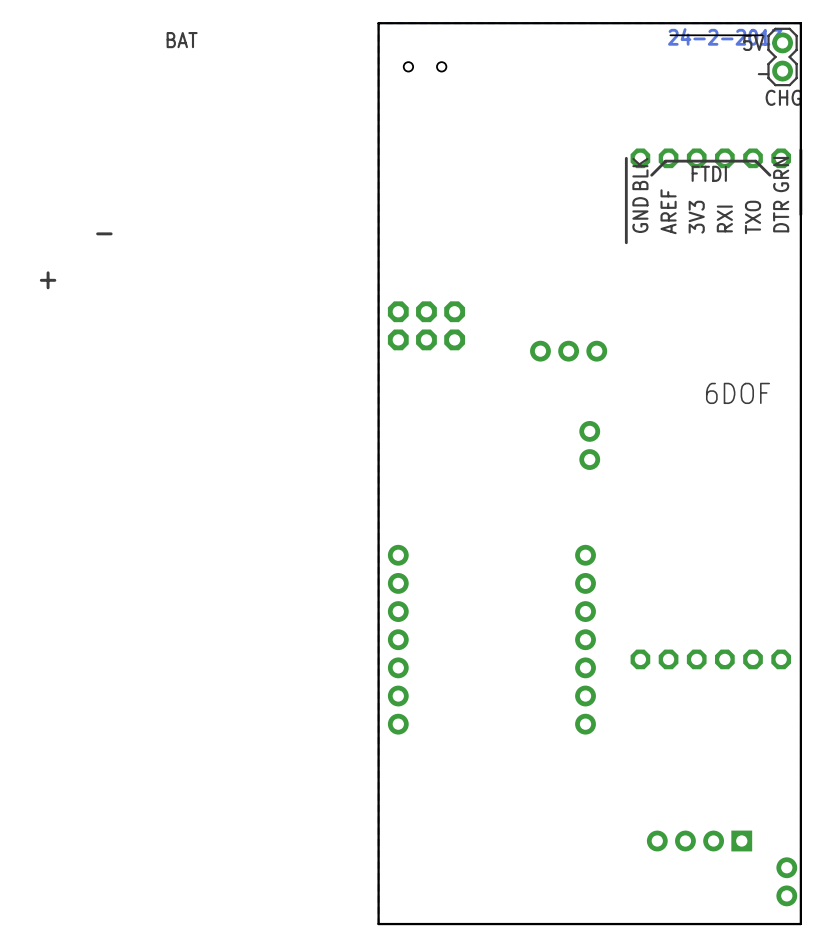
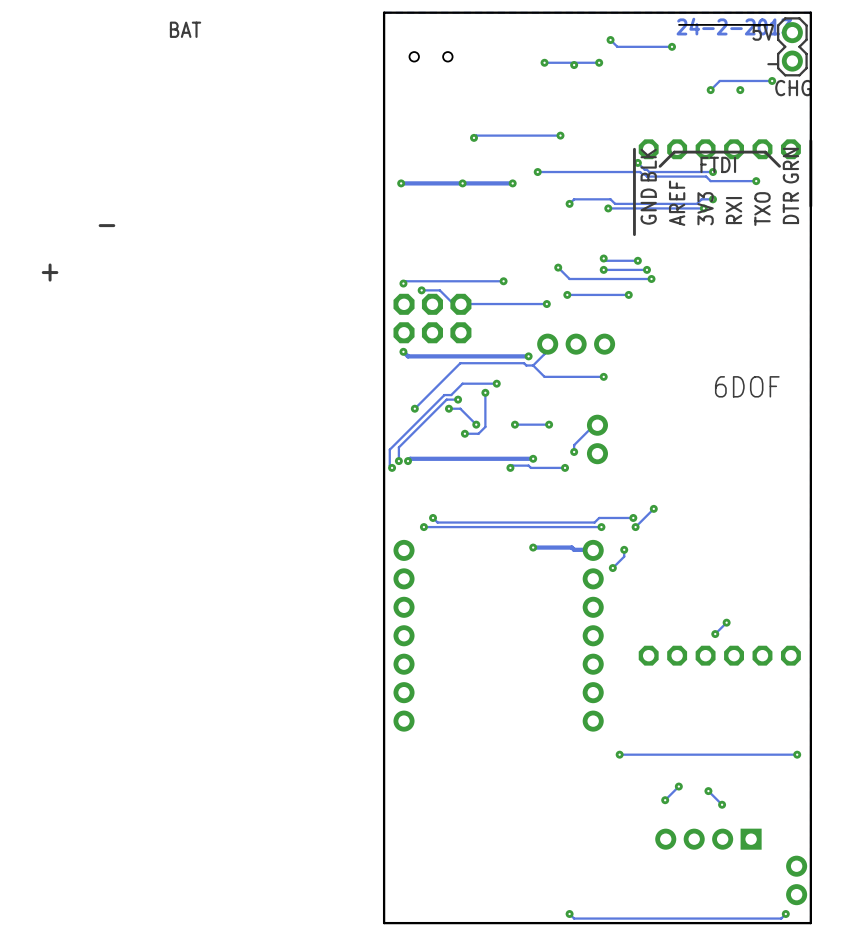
track: none -> (610, 40) (617, 46) (672, 46)
via: none -> (610, 40)
via: none -> (672, 46)
via: none -> (544, 62)
track: none -> (599, 62) (544, 62)
via: none -> (599, 62)
via: none -> (574, 65)
track: none -> (772, 80) (719, 80) (710, 90)
via: none -> (772, 80)
via: none -> (710, 90)
via: none -> (740, 90)
track: none -> (560, 135) (476, 135) (474, 137)
via: none -> (560, 135)
via: none -> (474, 137)
track: none -> (637, 162) (649, 172) (712, 172)
via: none -> (637, 162)
track: none -> (537, 172) (640, 172) (646, 176) (706, 176) (710, 181) (756, 181)
via: none -> (537, 172)
via: none -> (712, 172)
via: none -> (756, 181)
via: none -> (401, 183)
via: none -> (462, 183)
track: none -> (512, 183) (401, 183)
via: none -> (512, 183)
track: none -> (712, 199) (701, 199) (697, 203) (615, 203) (610, 199) (574, 199) (569, 203)
via: none -> (712, 199)
via: none -> (569, 203)
via: none -> (608, 208)
track: none -> (703, 208) (608, 208)
via: none -> (703, 208)
track: none -> (603, 258) (606, 260) (637, 260)
via: none -> (603, 258)
via: none -> (637, 260)
track: none -> (558, 267) (569, 278) (651, 278)
via: none -> (558, 267)
via: none -> (603, 269)
track: none -> (646, 269) (603, 269)
via: none -> (646, 269)
via: none -> (651, 278)
track: none -> (503, 281) (405, 281) (403, 283)
via: none -> (503, 281)
via: none -> (403, 283)
track: none -> (421, 290) (439, 290) (453, 304) (546, 304)
via: none -> (421, 290)
via: none -> (567, 294)
track: none -> (628, 294) (567, 294)
via: none -> (628, 294)
via: none -> (546, 304)
track: none -> (547, 344) (544, 345) (544, 354) (533, 365)
track: none -> (403, 351) (407, 356) (528, 356)
via: none -> (403, 351)
via: none -> (528, 356)
track: none -> (533, 365) (526, 365) (524, 363) (460, 363) (414, 408)
track: none -> (533, 365) (544, 376) (603, 376)
via: none -> (603, 376)
track: none -> (496, 383) (462, 383) (451, 395) (444, 395) (389, 449) (389, 465) (392, 467)
via: none -> (496, 383)
track: none -> (485, 392) (485, 426) (478, 433) (464, 433)
via: none -> (485, 392)
track: none -> (458, 399) (446, 399) (398, 447) (398, 461)
via: none -> (458, 399)
via: none -> (414, 408)
track: none -> (448, 408) (460, 408) (476, 424)
via: none -> (448, 408)
via: none -> (476, 424)
via: none -> (514, 424)
track: none -> (549, 424) (514, 424)
via: none -> (549, 424)
track: none -> (597, 425) (594, 424) (574, 445) (574, 451)
via: none -> (464, 433)
via: none -> (574, 451)
track: none -> (533, 458) (410, 458) (407, 461)
via: none -> (533, 458)
via: none -> (398, 461)
via: none -> (407, 461)
via: none -> (392, 467)
via: none -> (510, 467)
track: none -> (565, 467) (530, 467) (528, 465) (512, 465) (510, 467)
via: none -> (565, 467)
track: none -> (653, 508) (635, 527)
via: none -> (653, 508)
via: none -> (433, 517)
track: none -> (633, 517) (599, 517) (594, 522) (437, 522) (433, 517)
via: none -> (633, 517)
via: none -> (423, 527)
track: none -> (601, 527) (423, 527)
via: none -> (601, 527)
via: none -> (635, 527)
track: none -> (533, 547) (571, 547) (574, 549) (593, 550)
via: none -> (533, 547)
track: none -> (624, 549) (624, 556) (612, 568)
via: none -> (624, 549)
via: none -> (612, 568)
track: none -> (726, 622) (715, 634)
via: none -> (726, 622)
via: none -> (715, 634)
via: none -> (619, 754)
track: none -> (797, 754) (619, 754)
via: none -> (797, 754)
track: none -> (678, 786) (665, 800)
via: none -> (678, 786)
track: none -> (708, 791) (722, 804)
via: none -> (708, 791)
via: none -> (665, 800)
via: none -> (722, 804)
via: none -> (569, 914)
track: none -> (785, 914) (781, 918) (574, 918) (569, 914)
via: none -> (785, 914)

